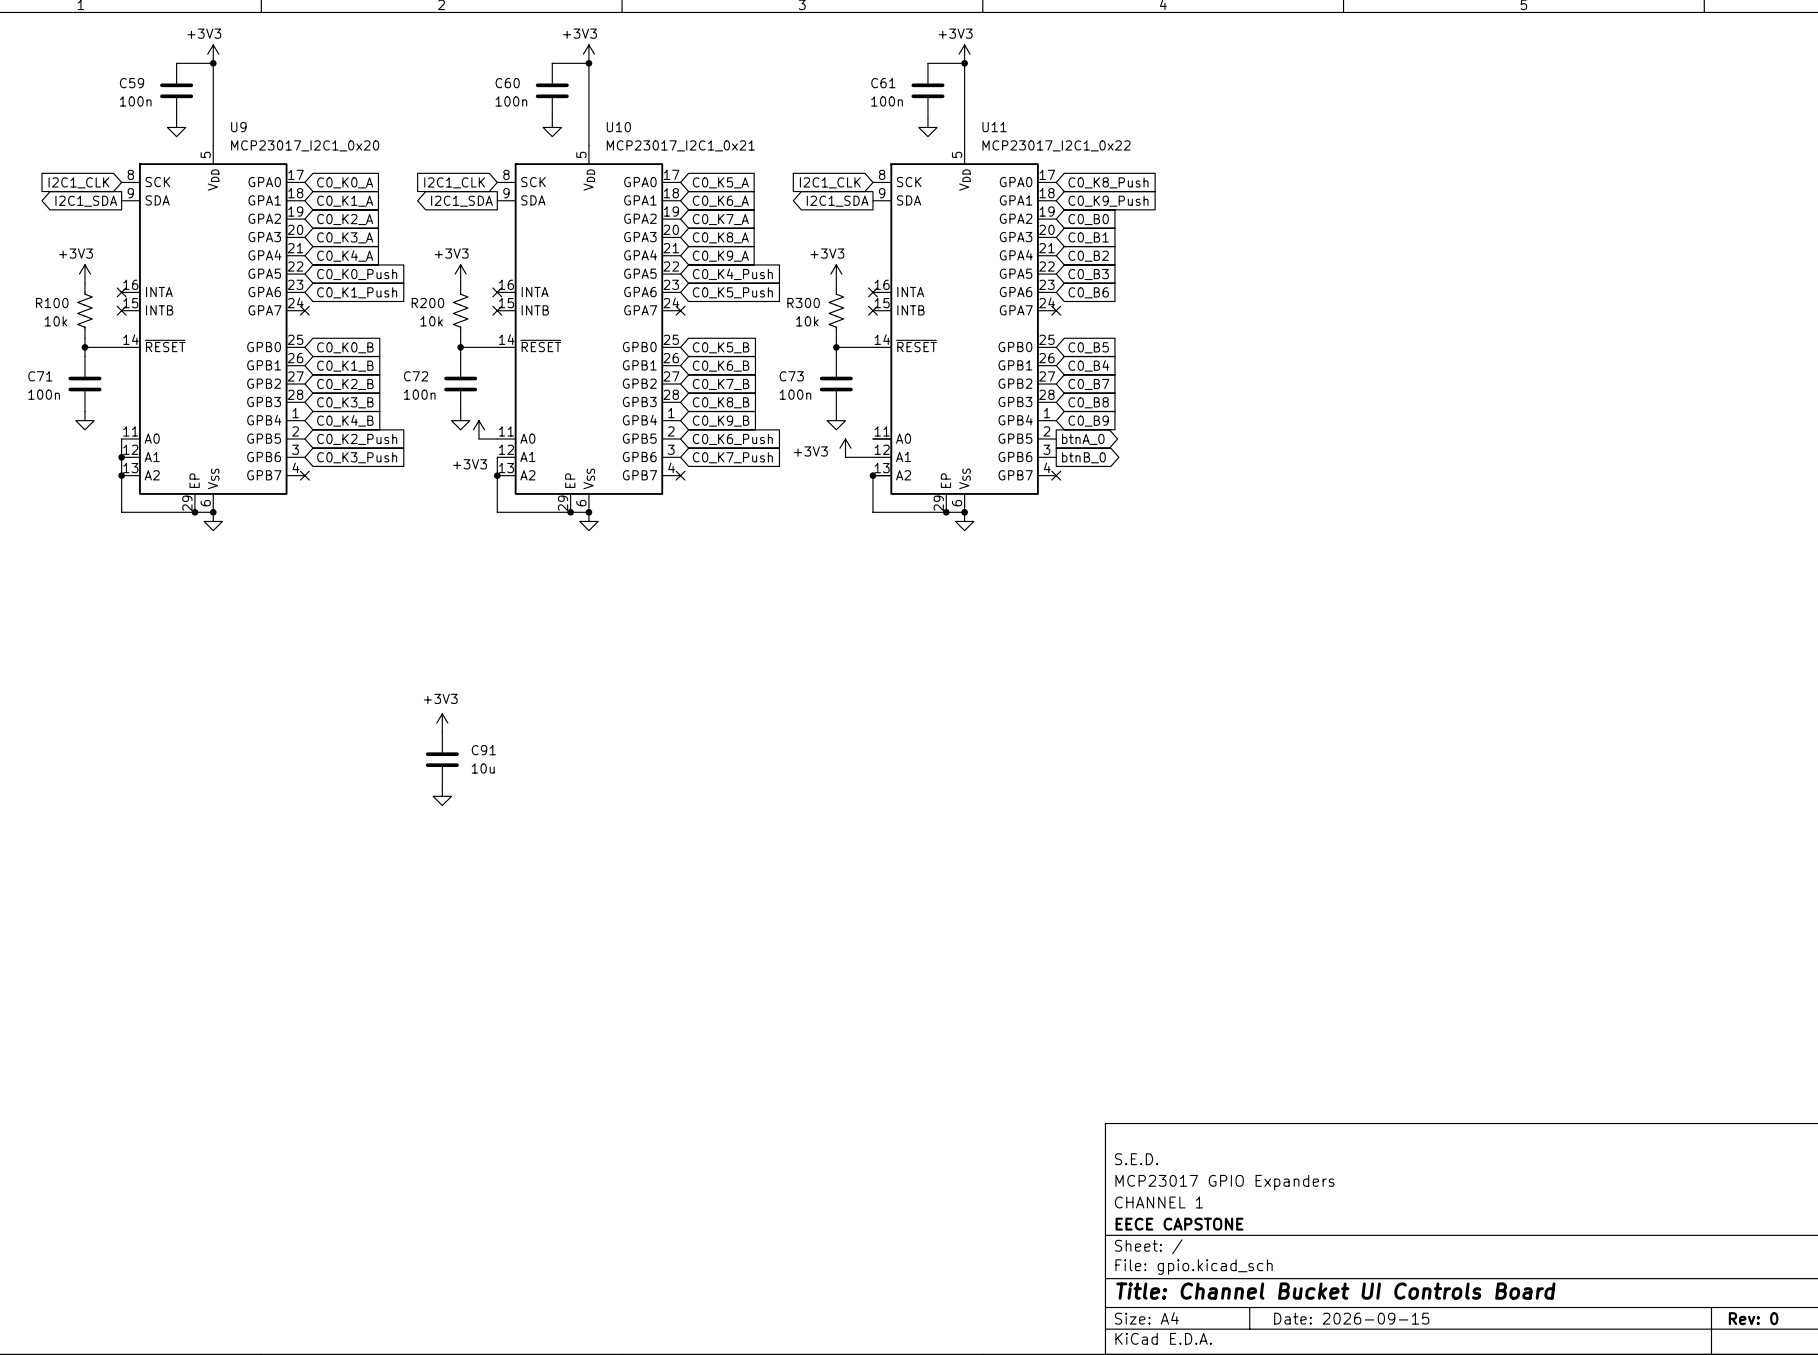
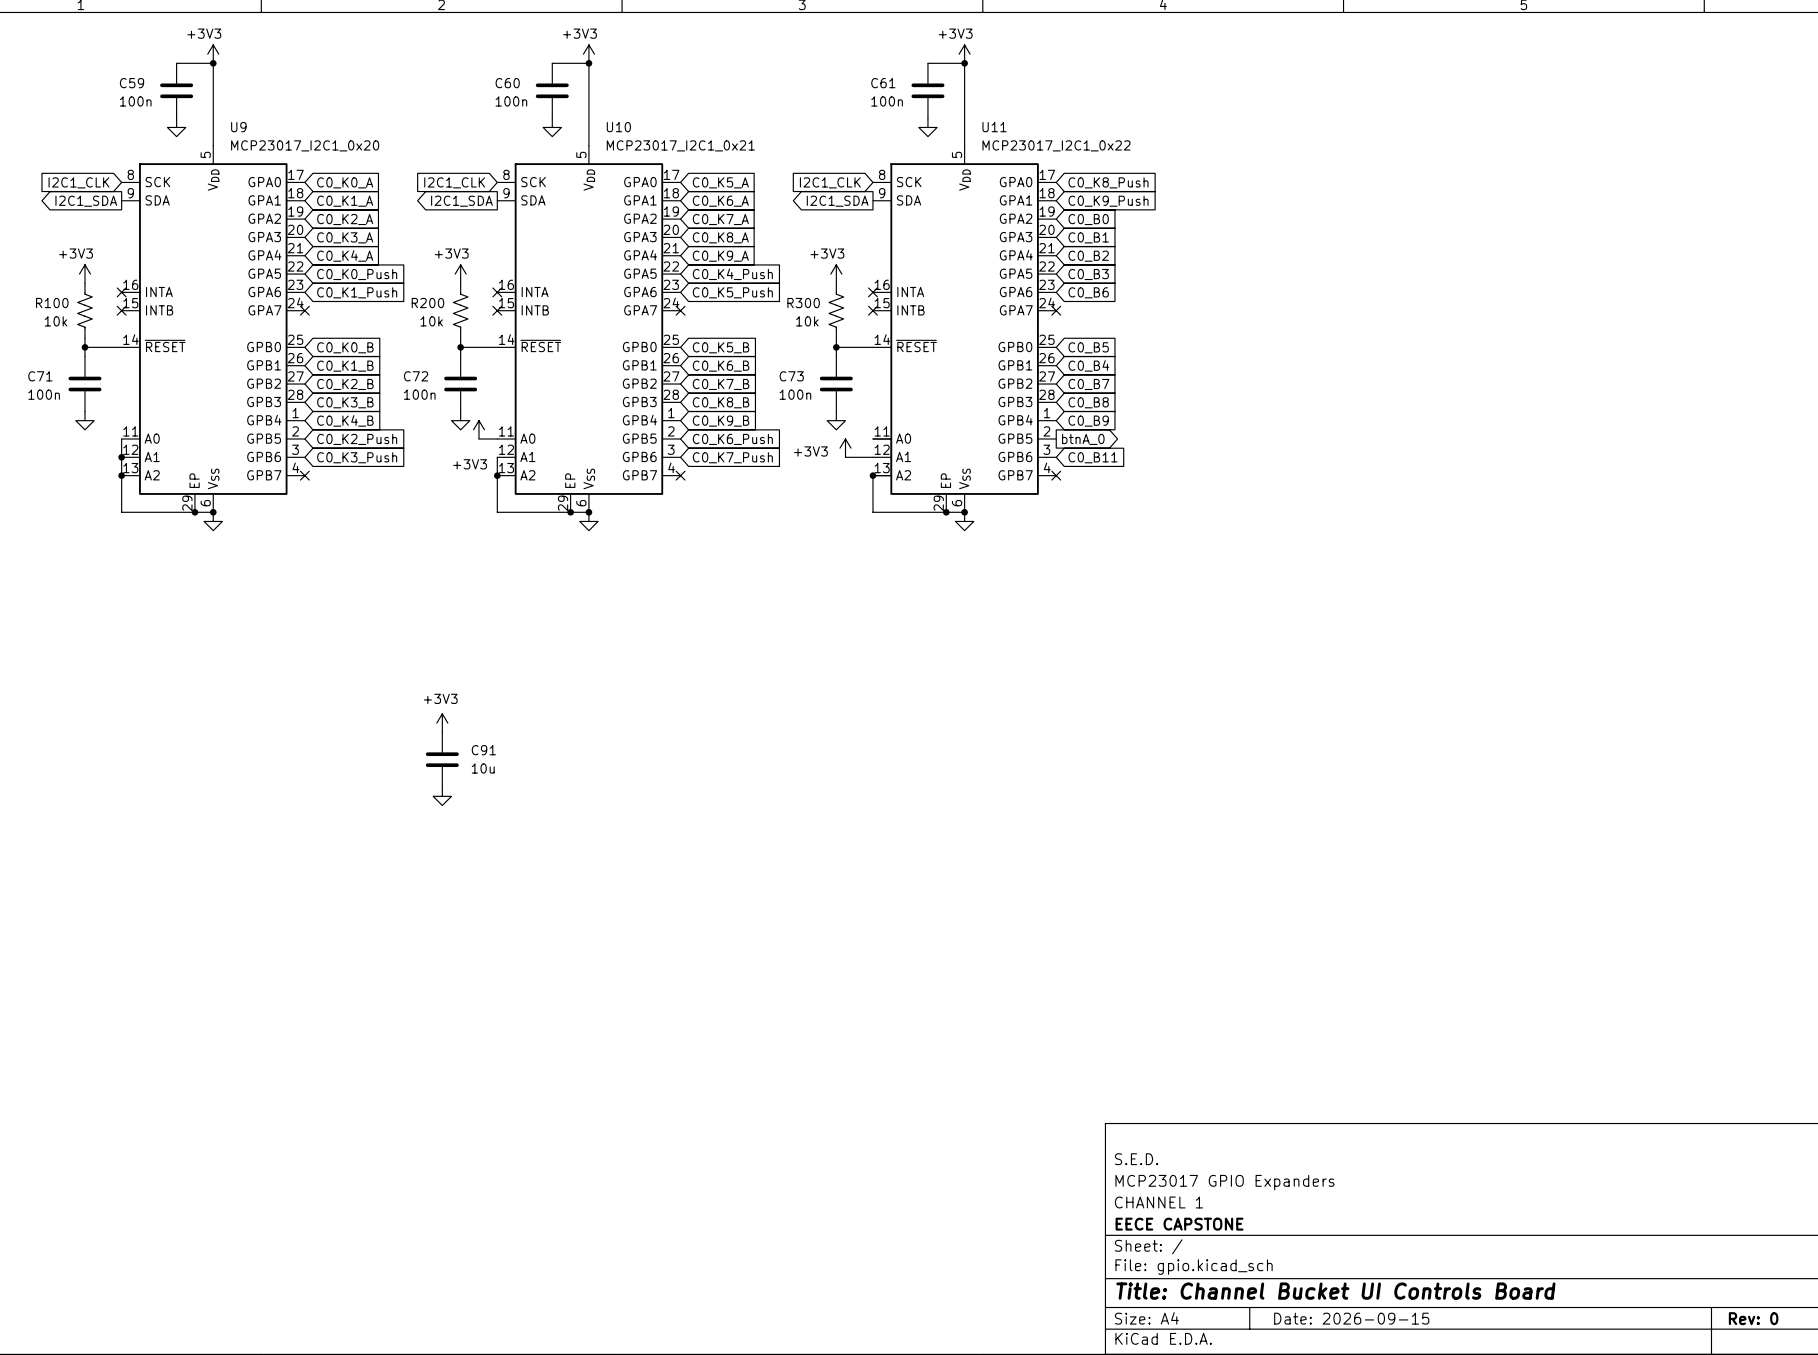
global label shape: output (1083, 457) -> input (1093, 457)
global label: btnB_0 (1083, 457) -> C0_B11 (1093, 457)

